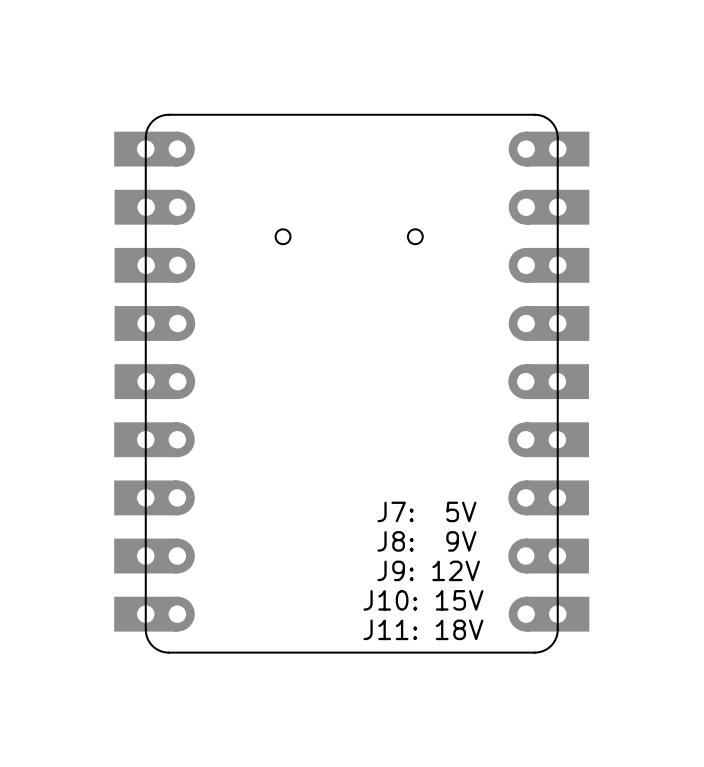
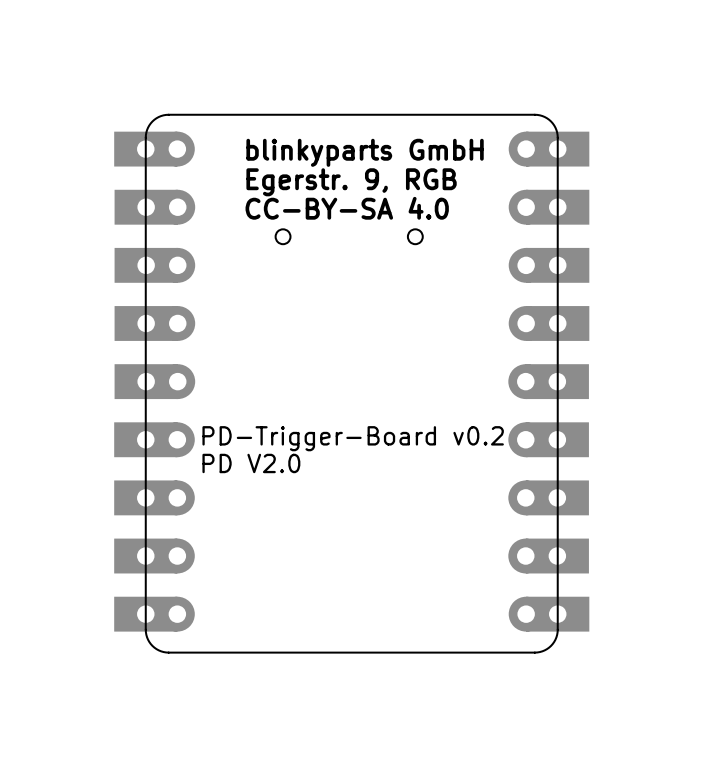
text: none -> blinkyparts GmbH (365, 152)
text: none -> Egerstr. 9, RGB (351, 182)
text: none -> CC-BY-SA 4.0 (347, 208)
text: none -> PD-Trigger-Board v0.2 (353, 438)
text: none -> PD V2.0 (251, 463)
text: J7: 5V (426, 511) -> none
text: J8: 9V (426, 541) -> none
text: J9: 12V (428, 570) -> none
text: J10: 15V (423, 600) -> none
text: J11: 18V (423, 629) -> none

